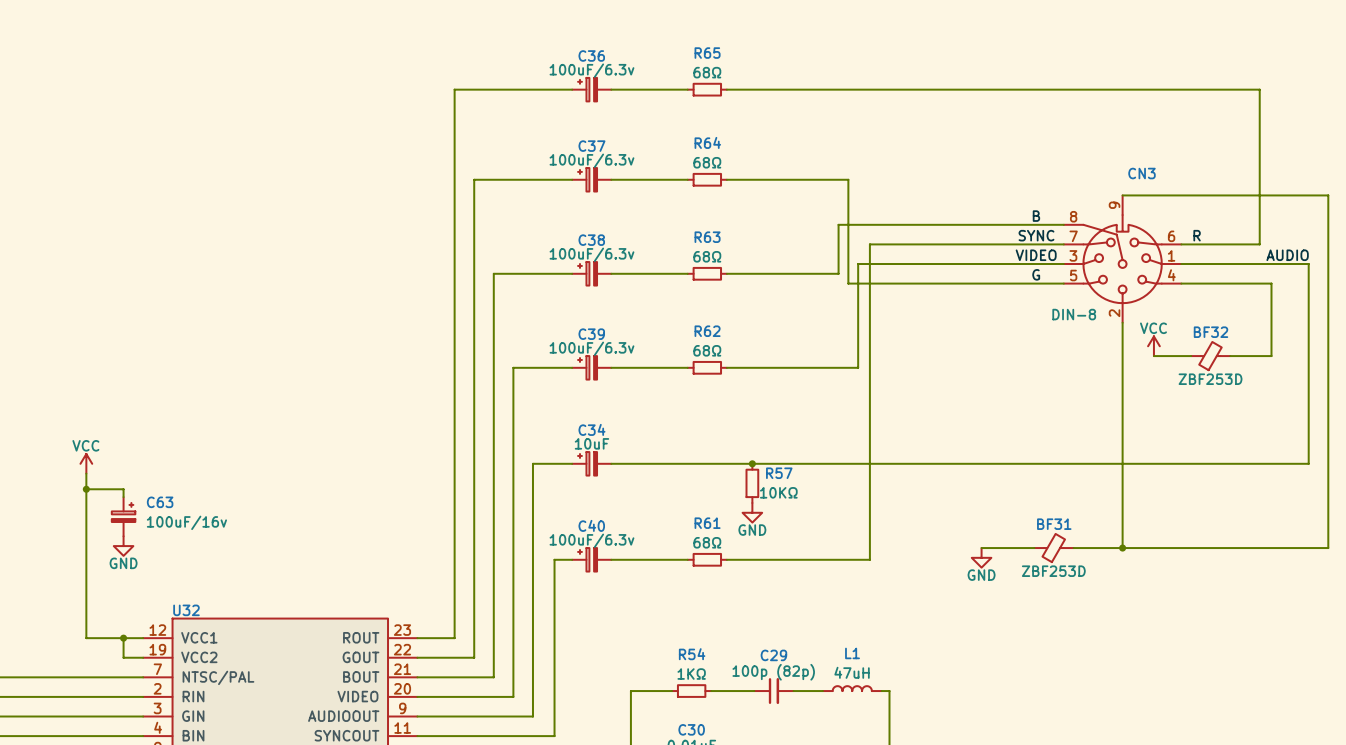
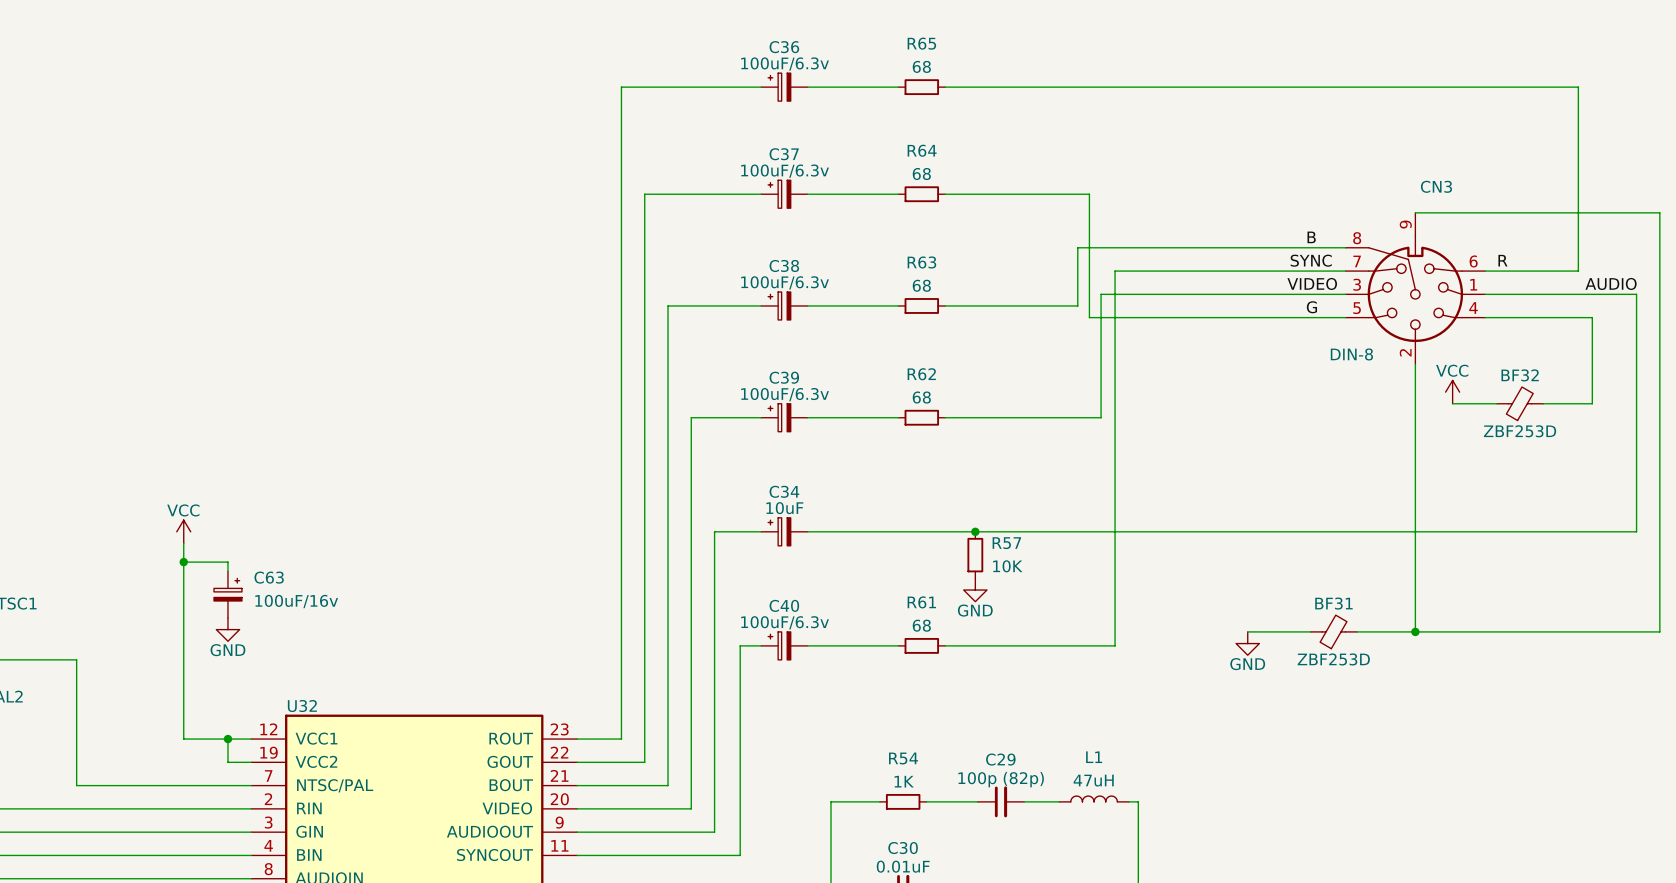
R65 value: 68Ω (707, 72) -> 68 (921, 66)
R64 value: 68Ω (707, 162) -> 68 (921, 174)
R63 value: 68Ω (707, 256) -> 68 (921, 285)
R62 value: 68Ω (707, 350) -> 68 (921, 397)
R57 value: 10KΩ (778, 492) -> 10K (1007, 566)
R61 value: 68Ω (707, 542) -> 68 (921, 625)
R54 value: 1KΩ (691, 674) -> 1K (904, 781)

